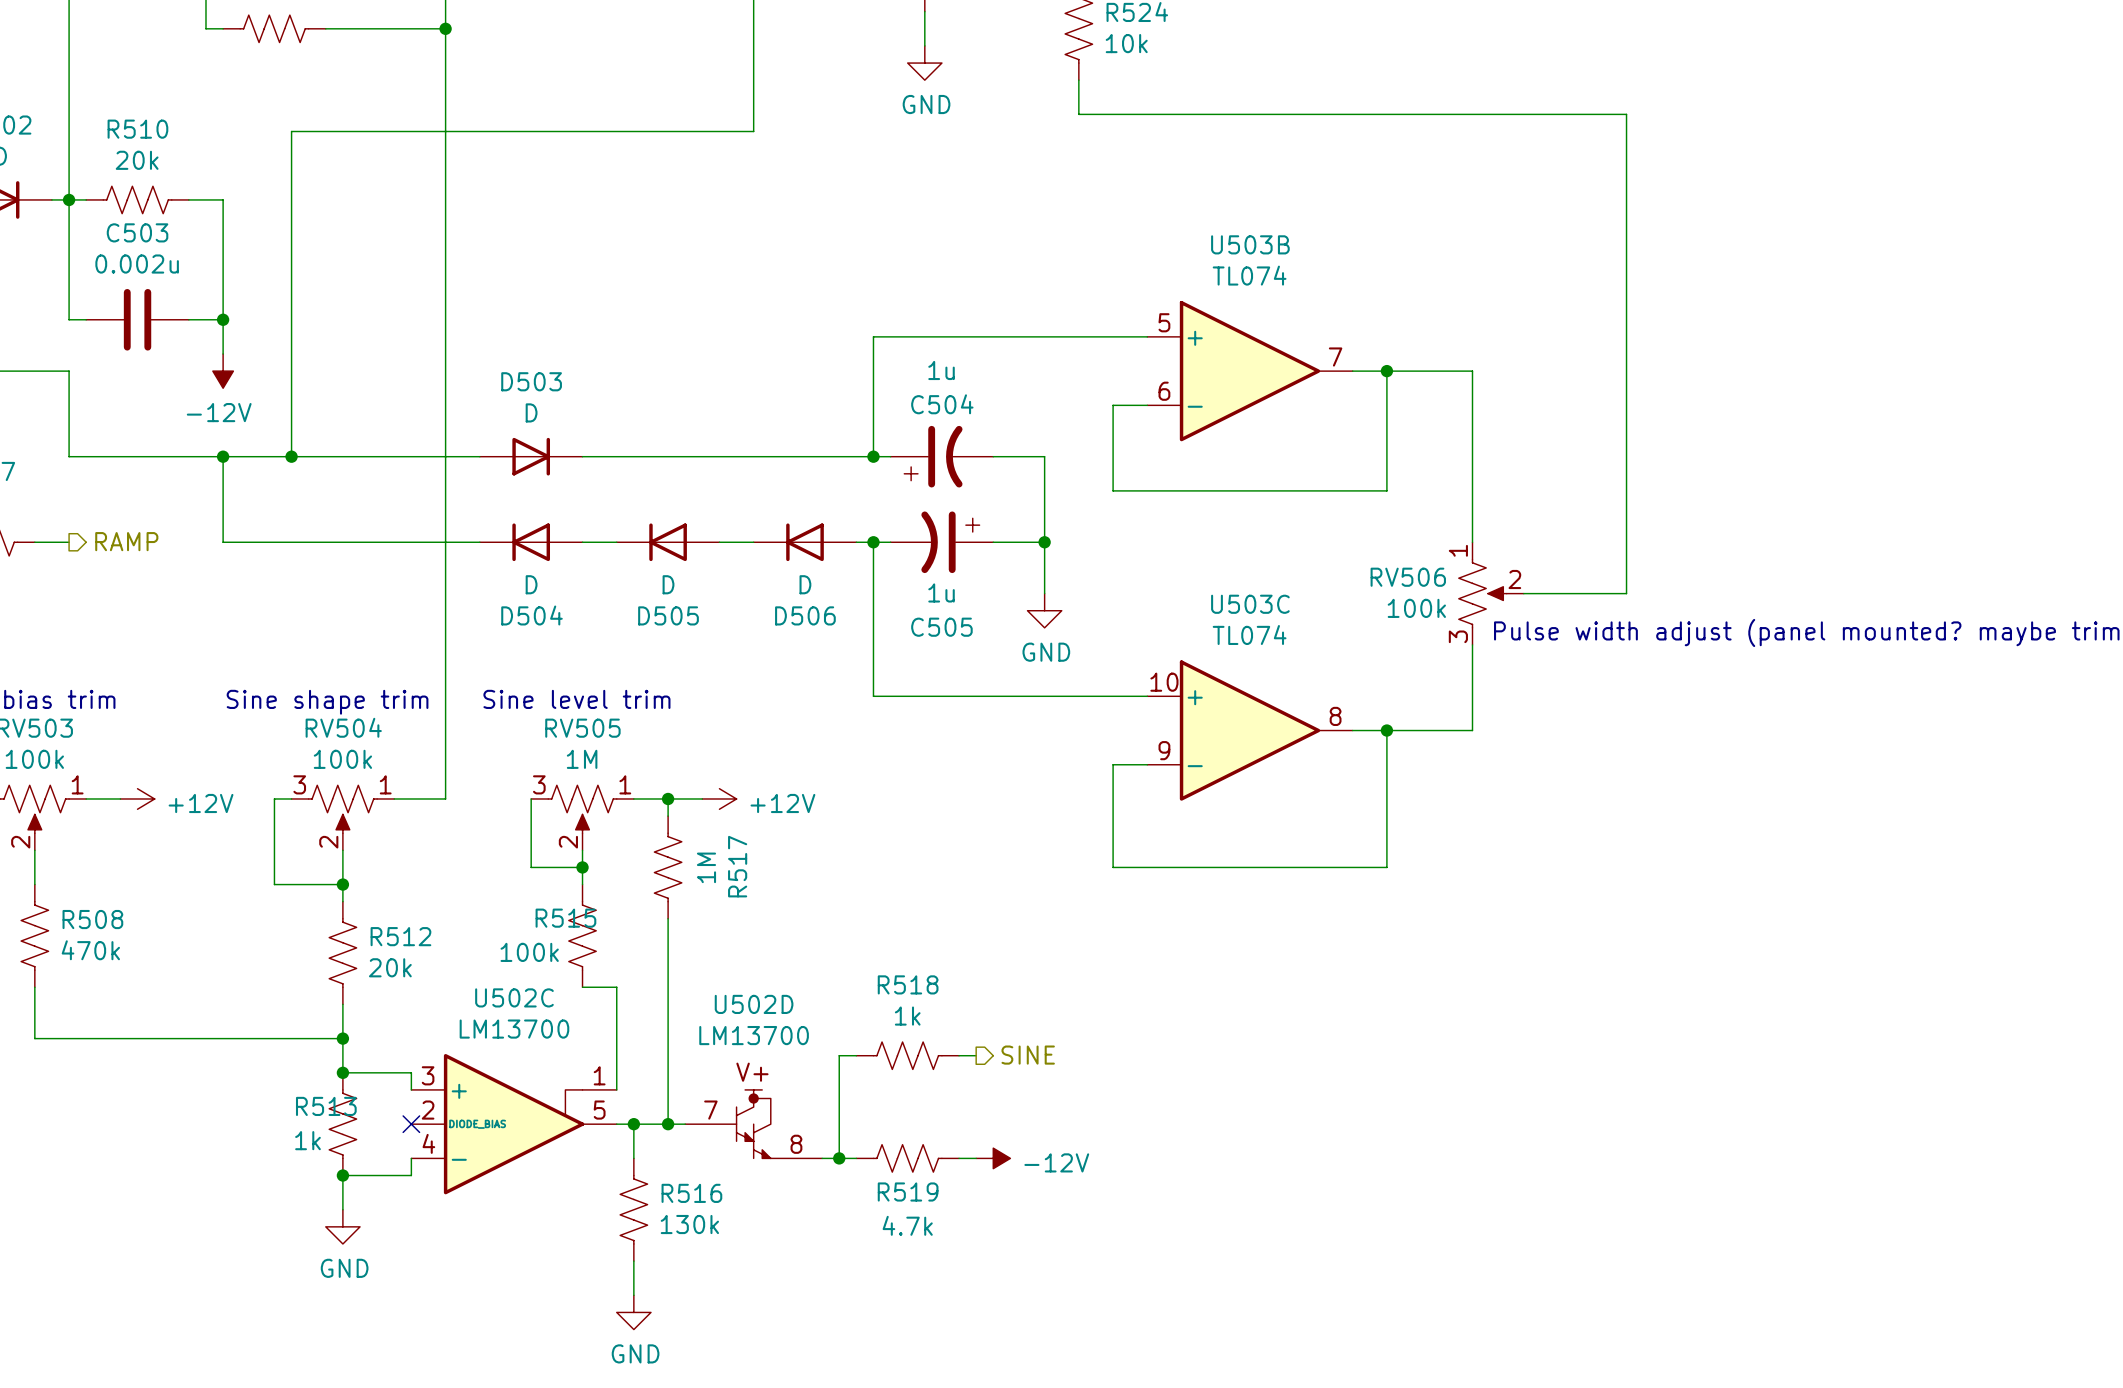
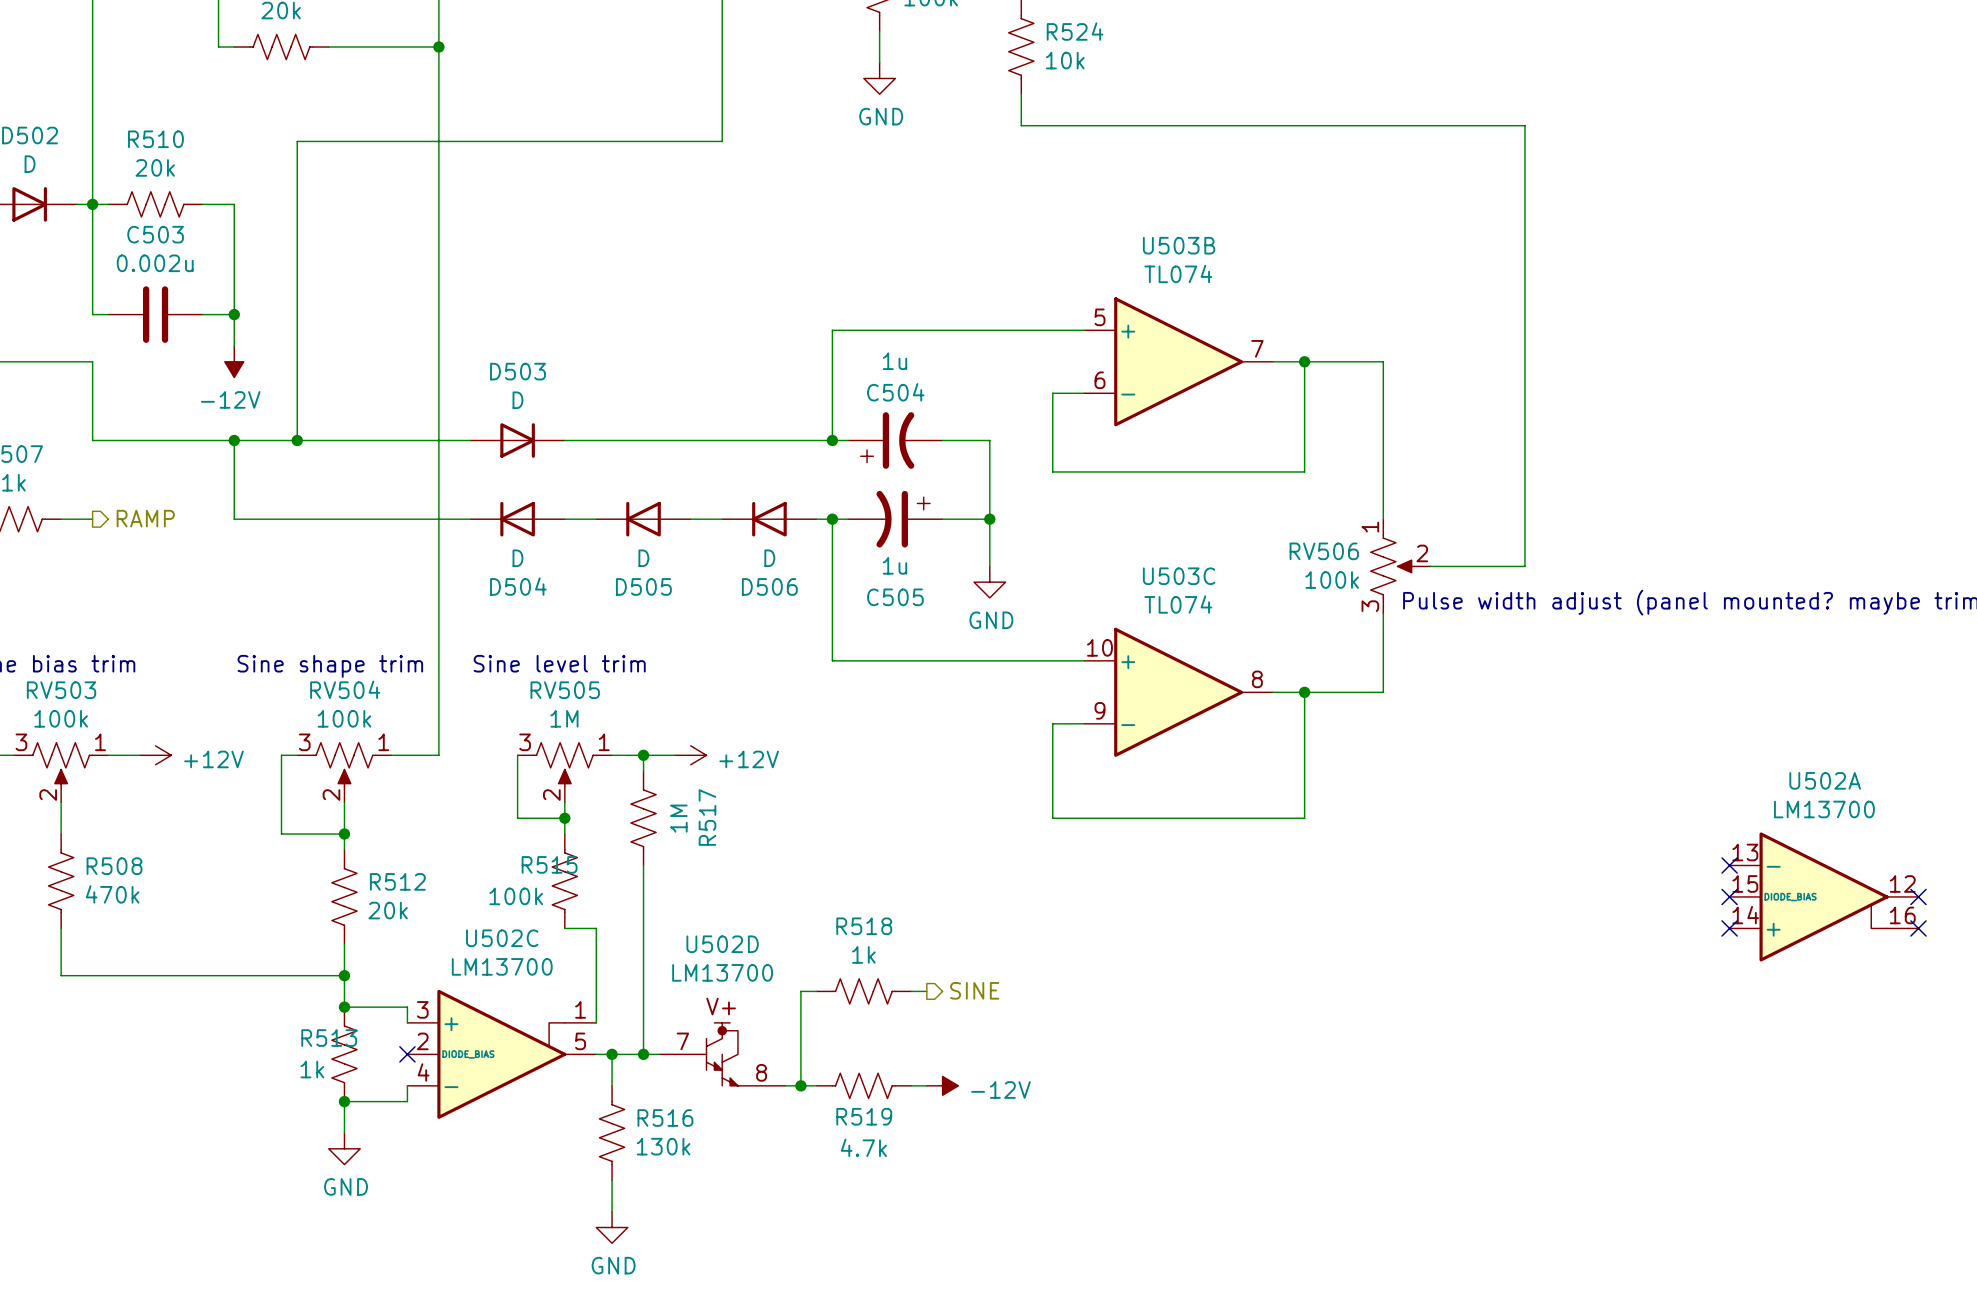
no-connect mark: none -> (1729, 865)
no-connect mark: none -> (1729, 896)
U502A: none -> LM13700 (1824, 896)
no-connect mark: none -> (1918, 896)
no-connect mark: none -> (1729, 928)
no-connect mark: none -> (1918, 928)

